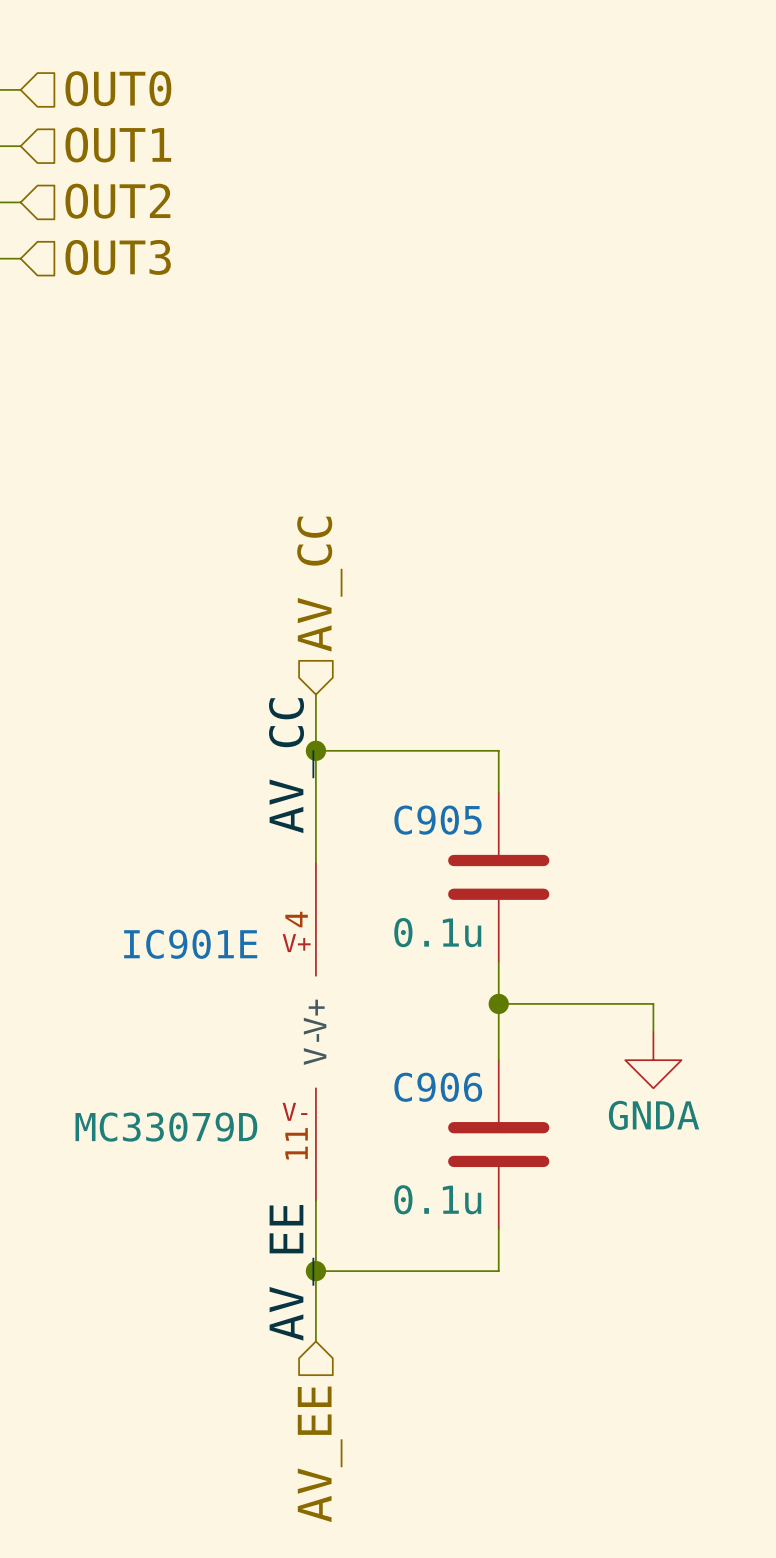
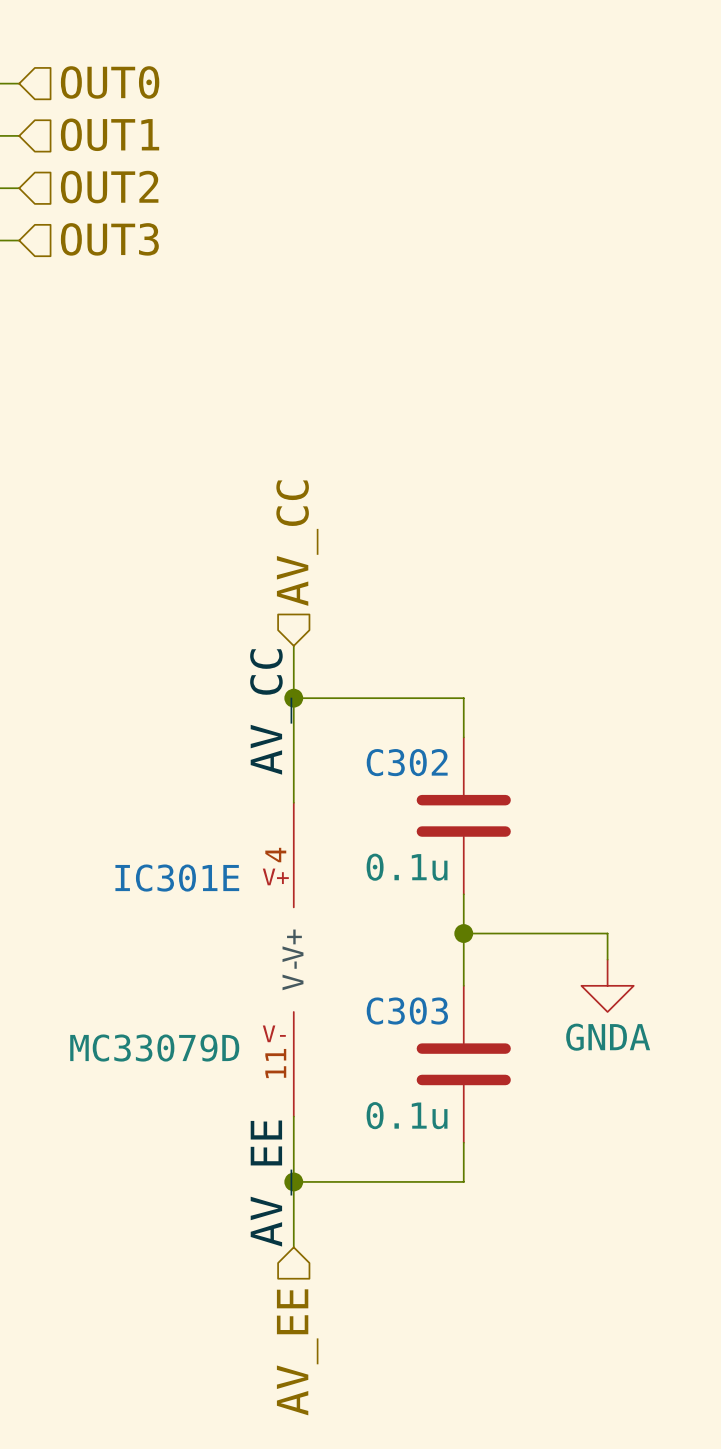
C905 name: C905 (437, 820) -> C302 (407, 762)
IC901E name: IC901E (190, 944) -> IC301E (177, 878)
C906 name: C906 (438, 1087) -> C303 (407, 1011)

